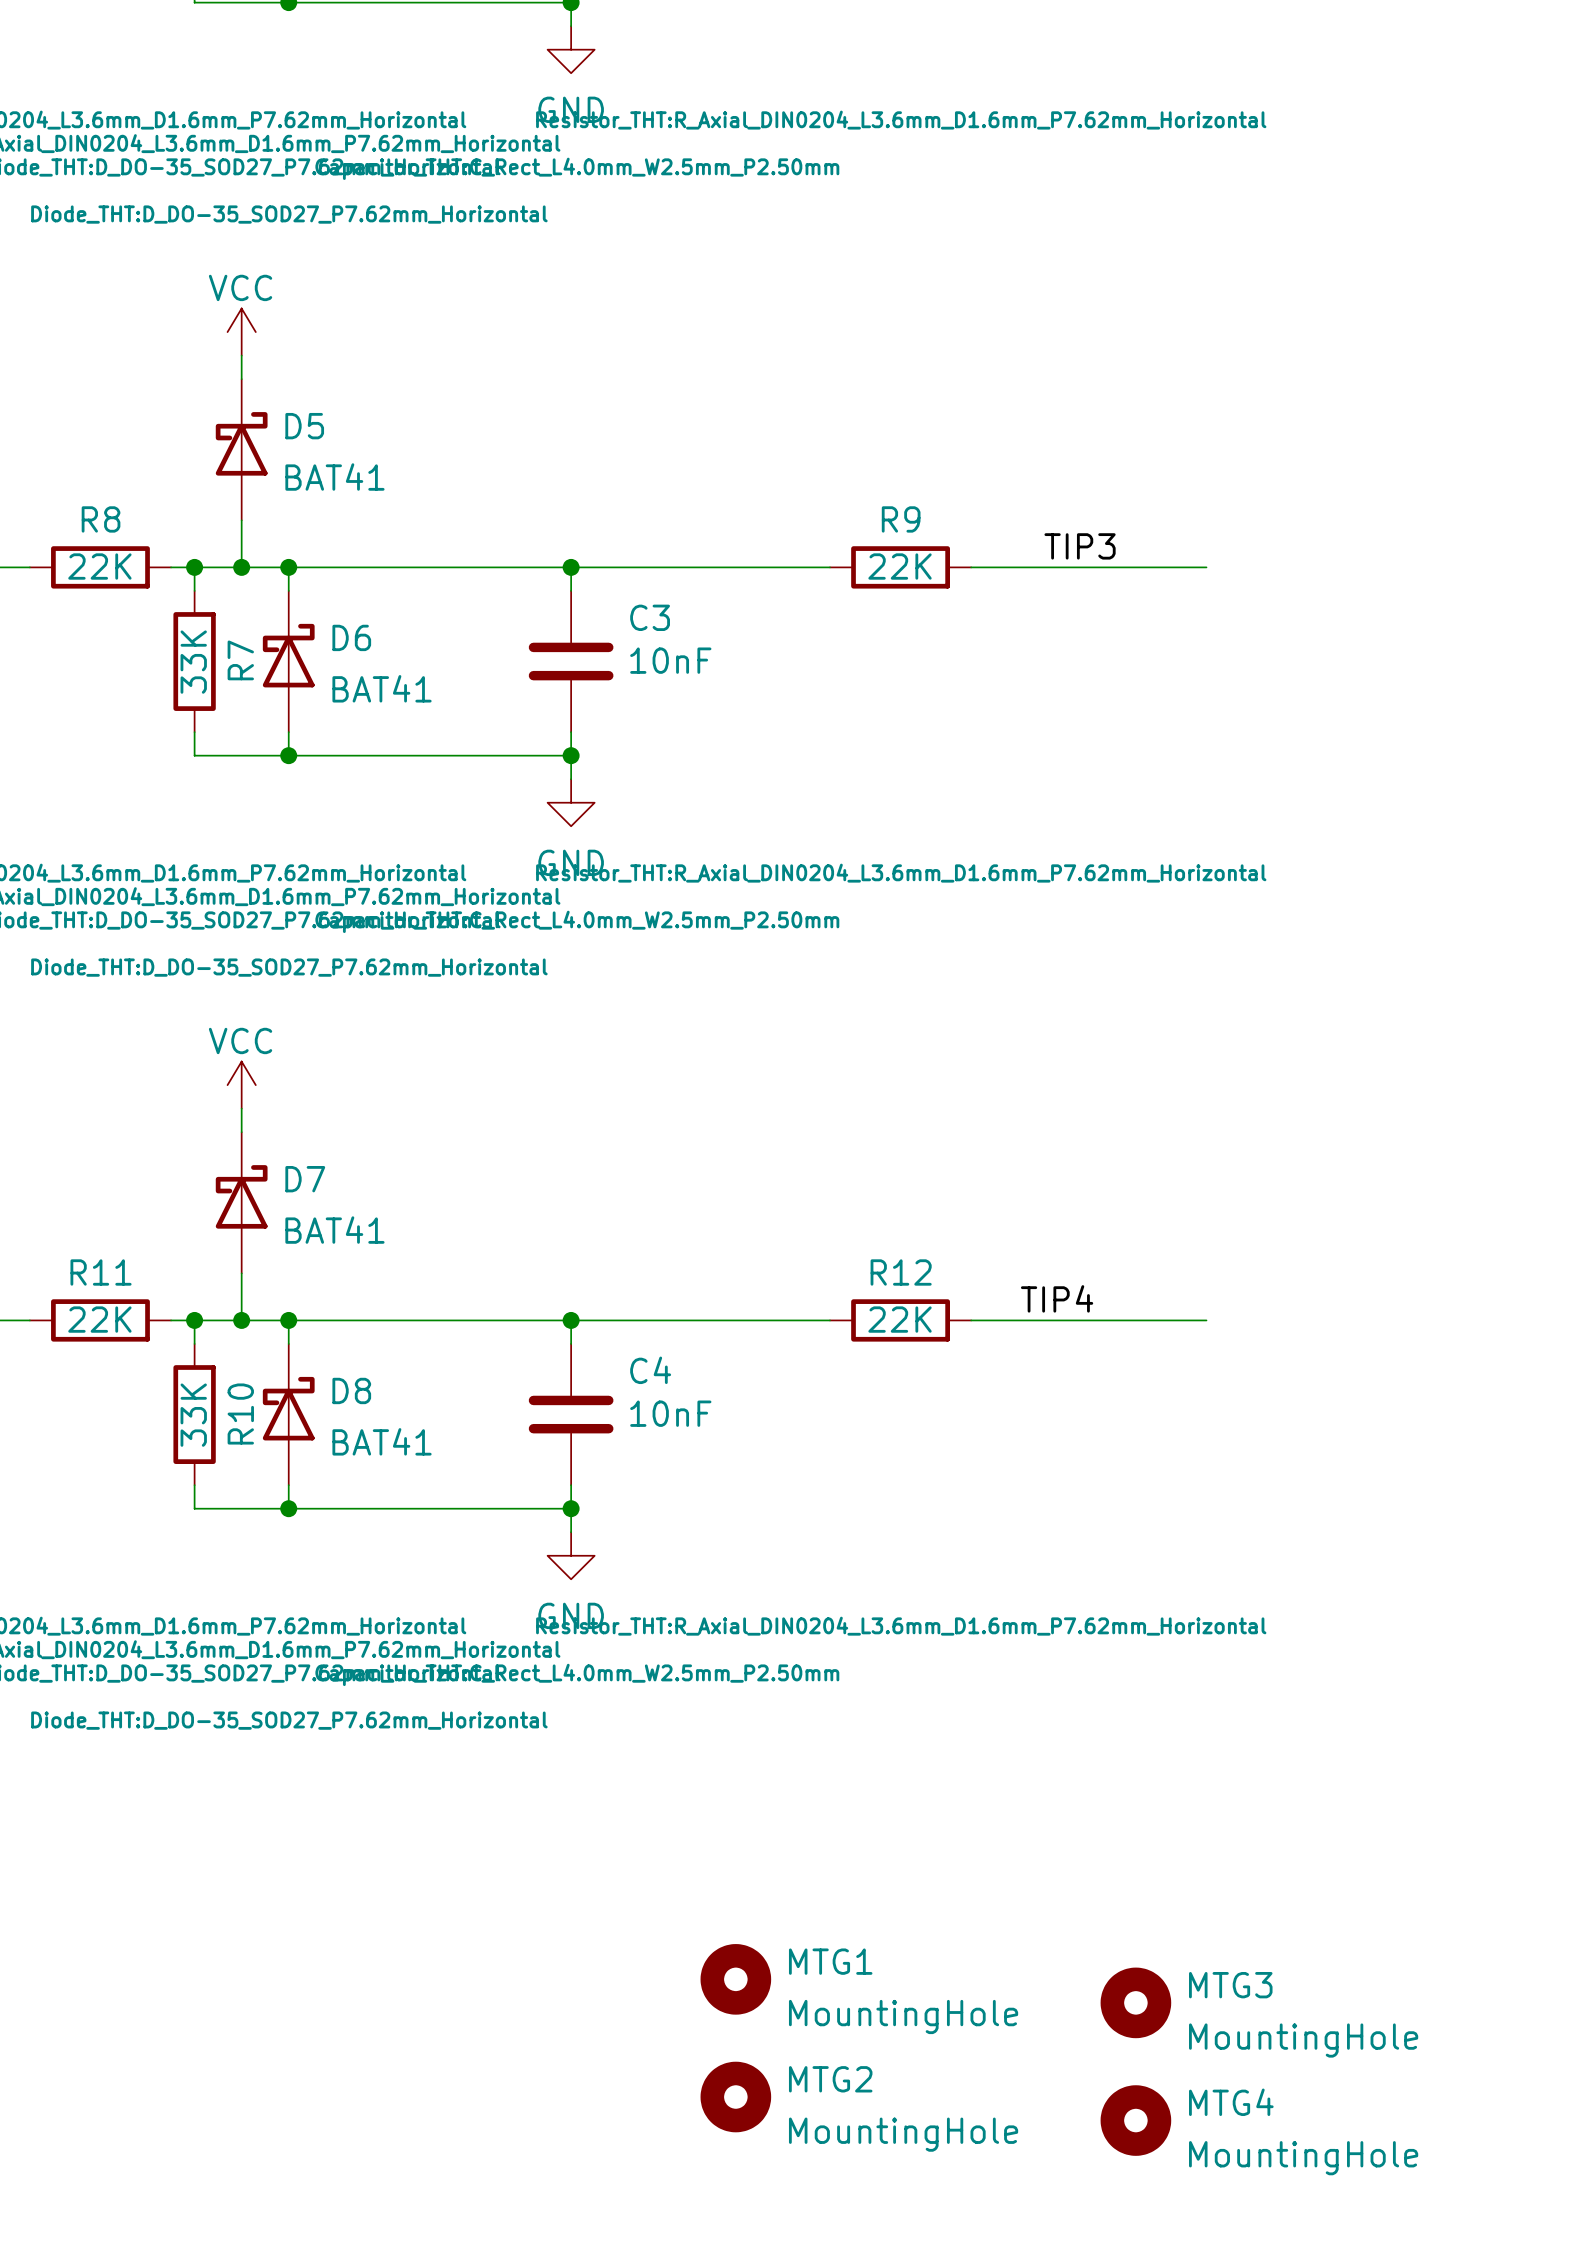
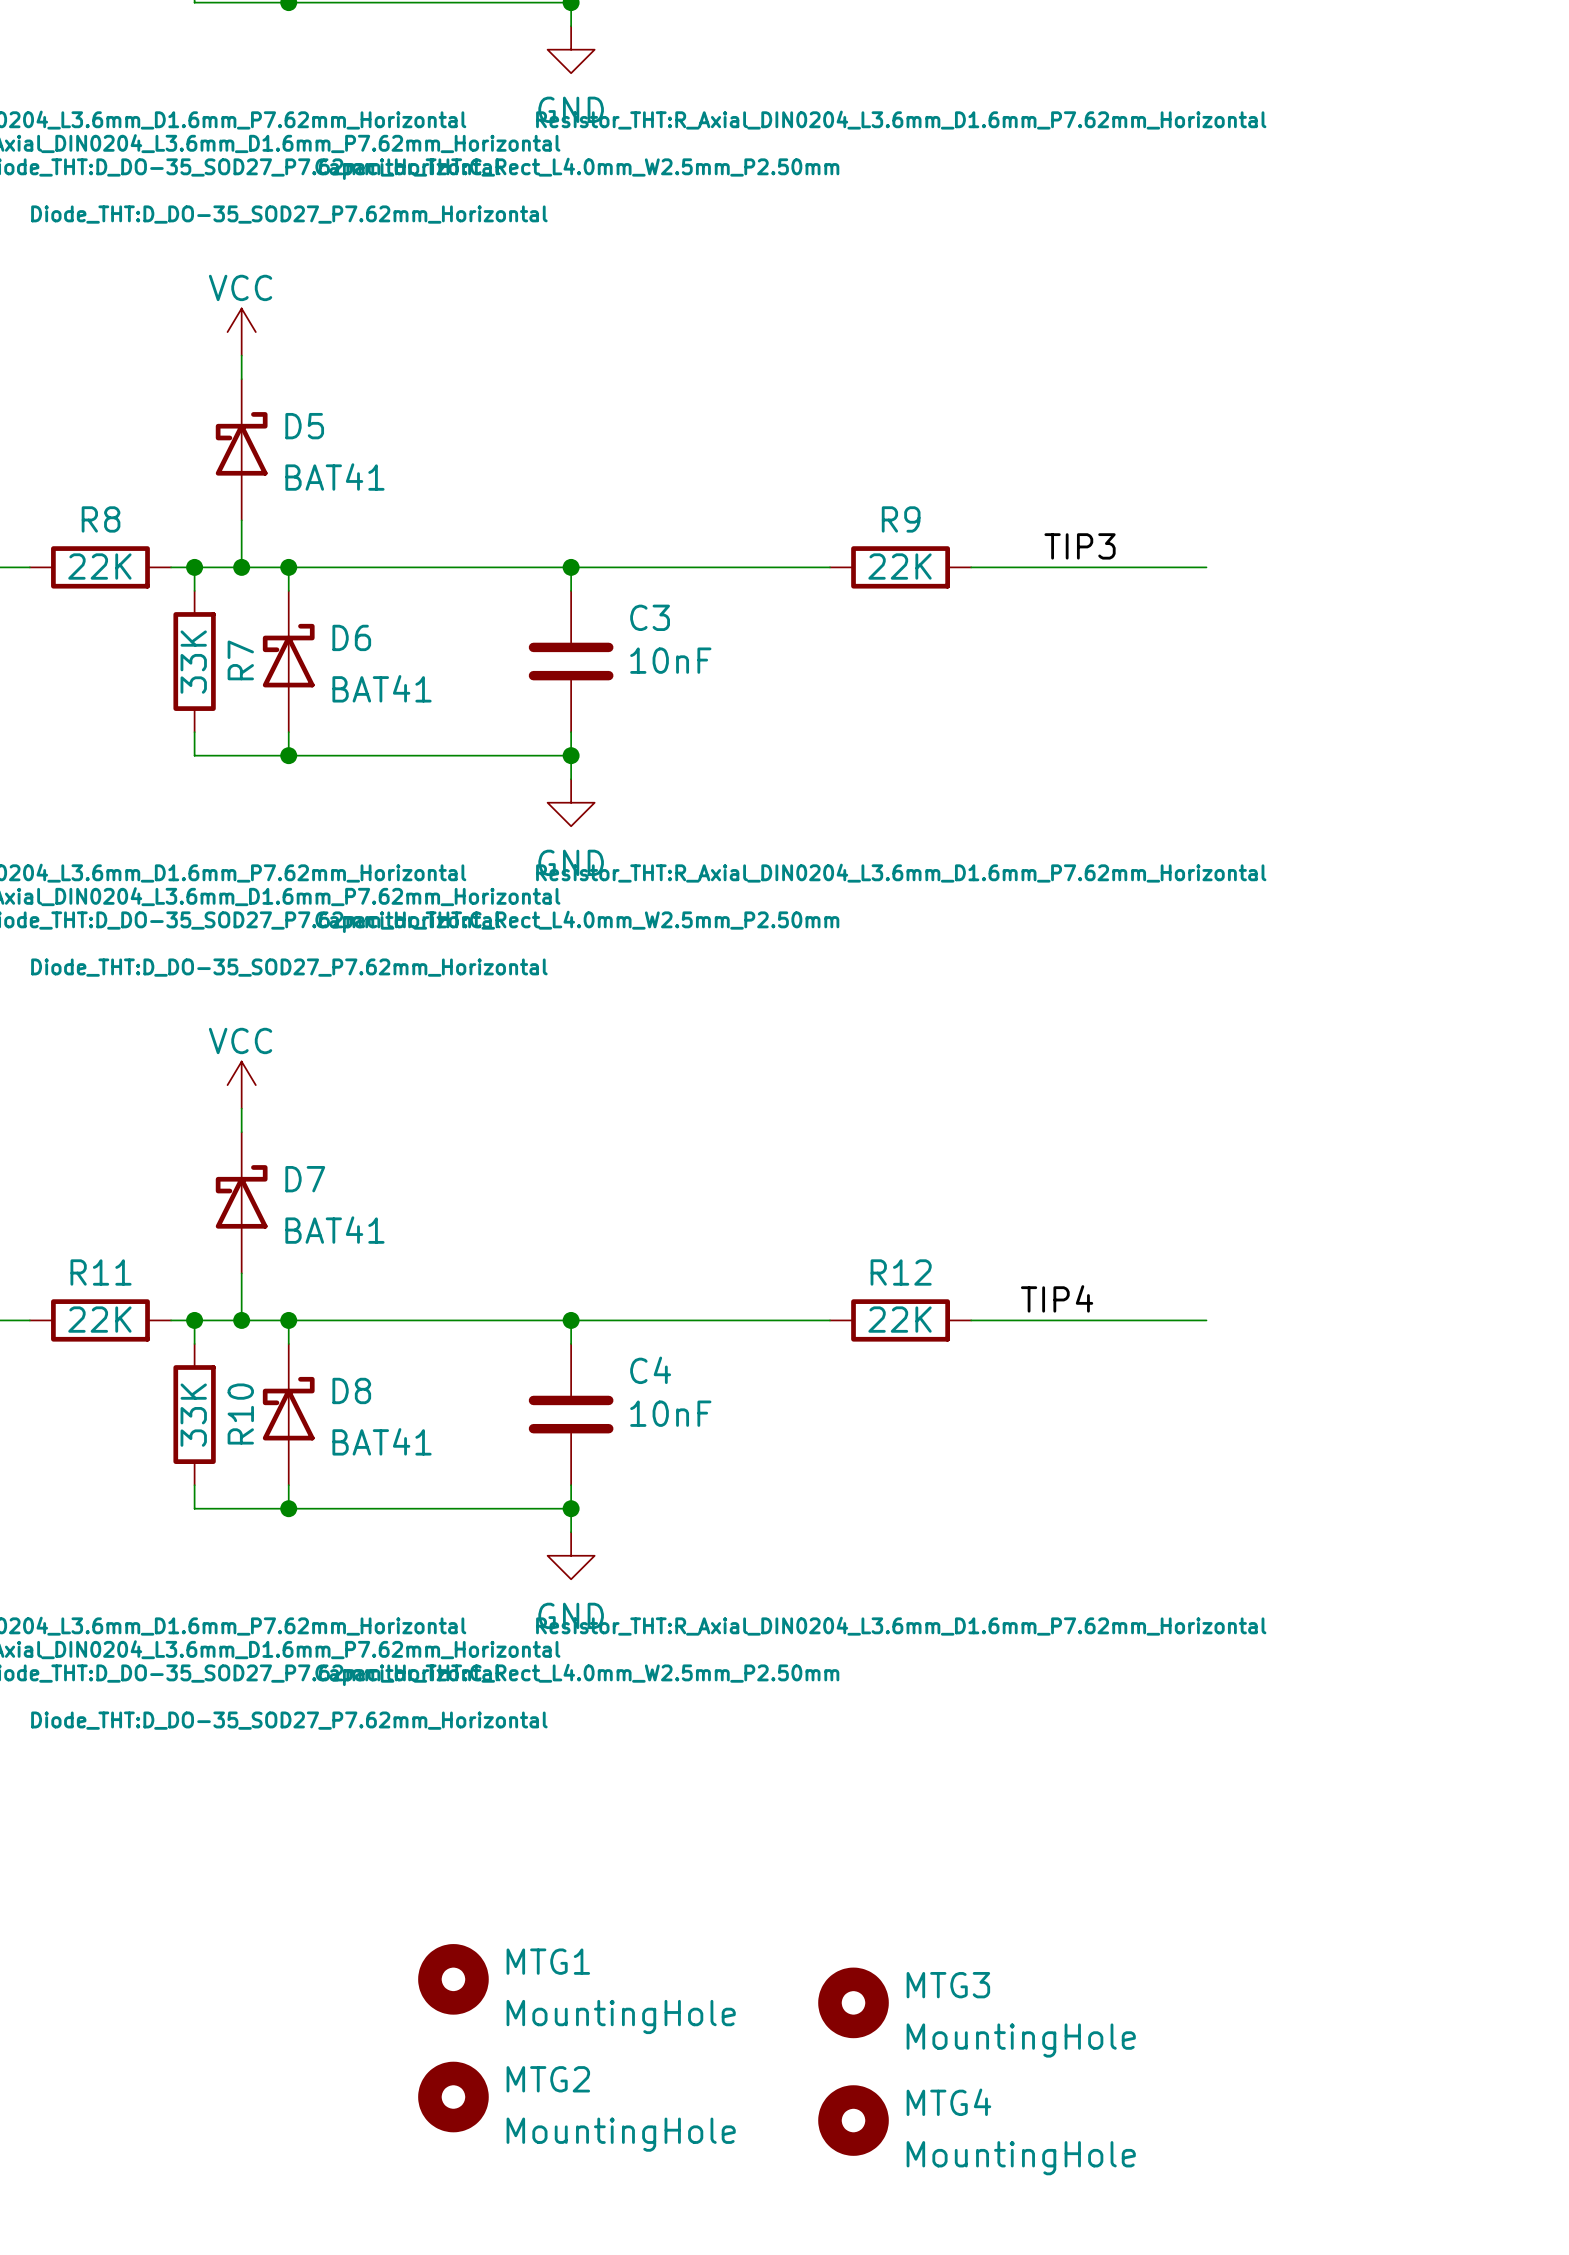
MTG1 position: (735, 1979) -> (453, 1979)
MTG3 position: (1135, 2002) -> (853, 2002)
MTG2 position: (735, 2097) -> (453, 2097)
MTG4 position: (1135, 2120) -> (853, 2120)

